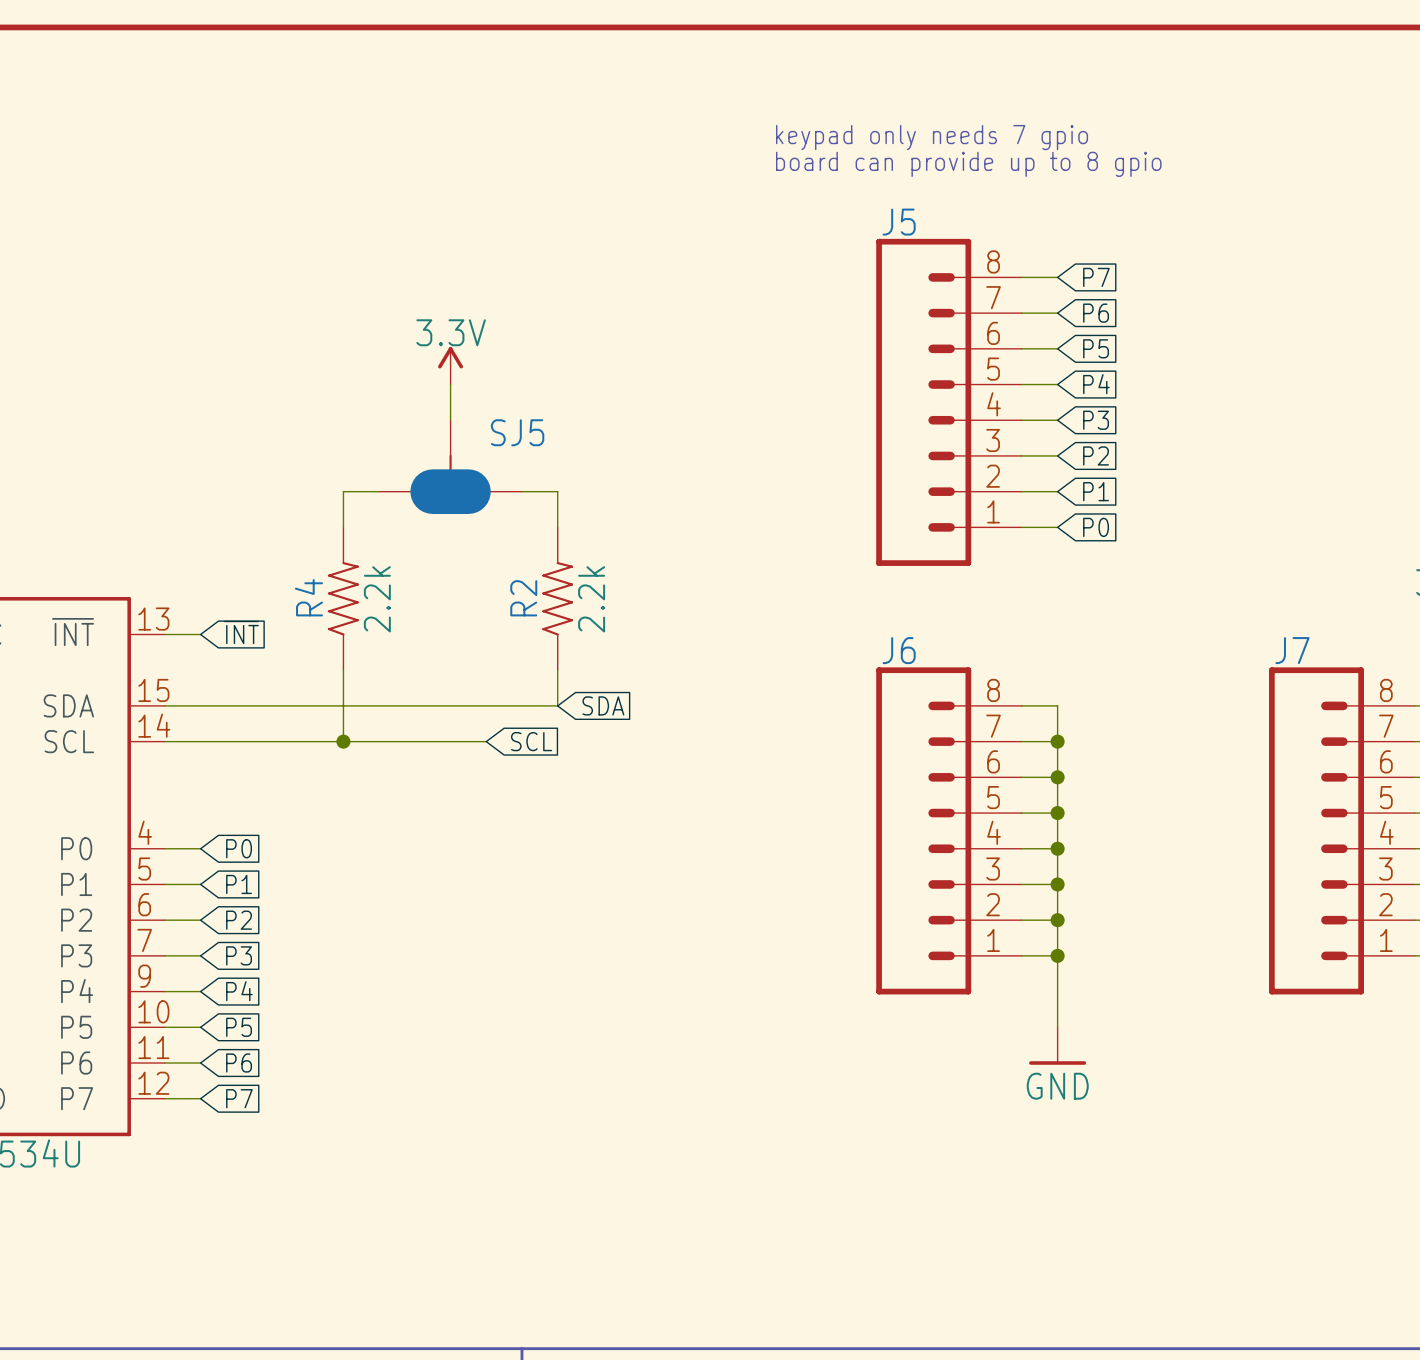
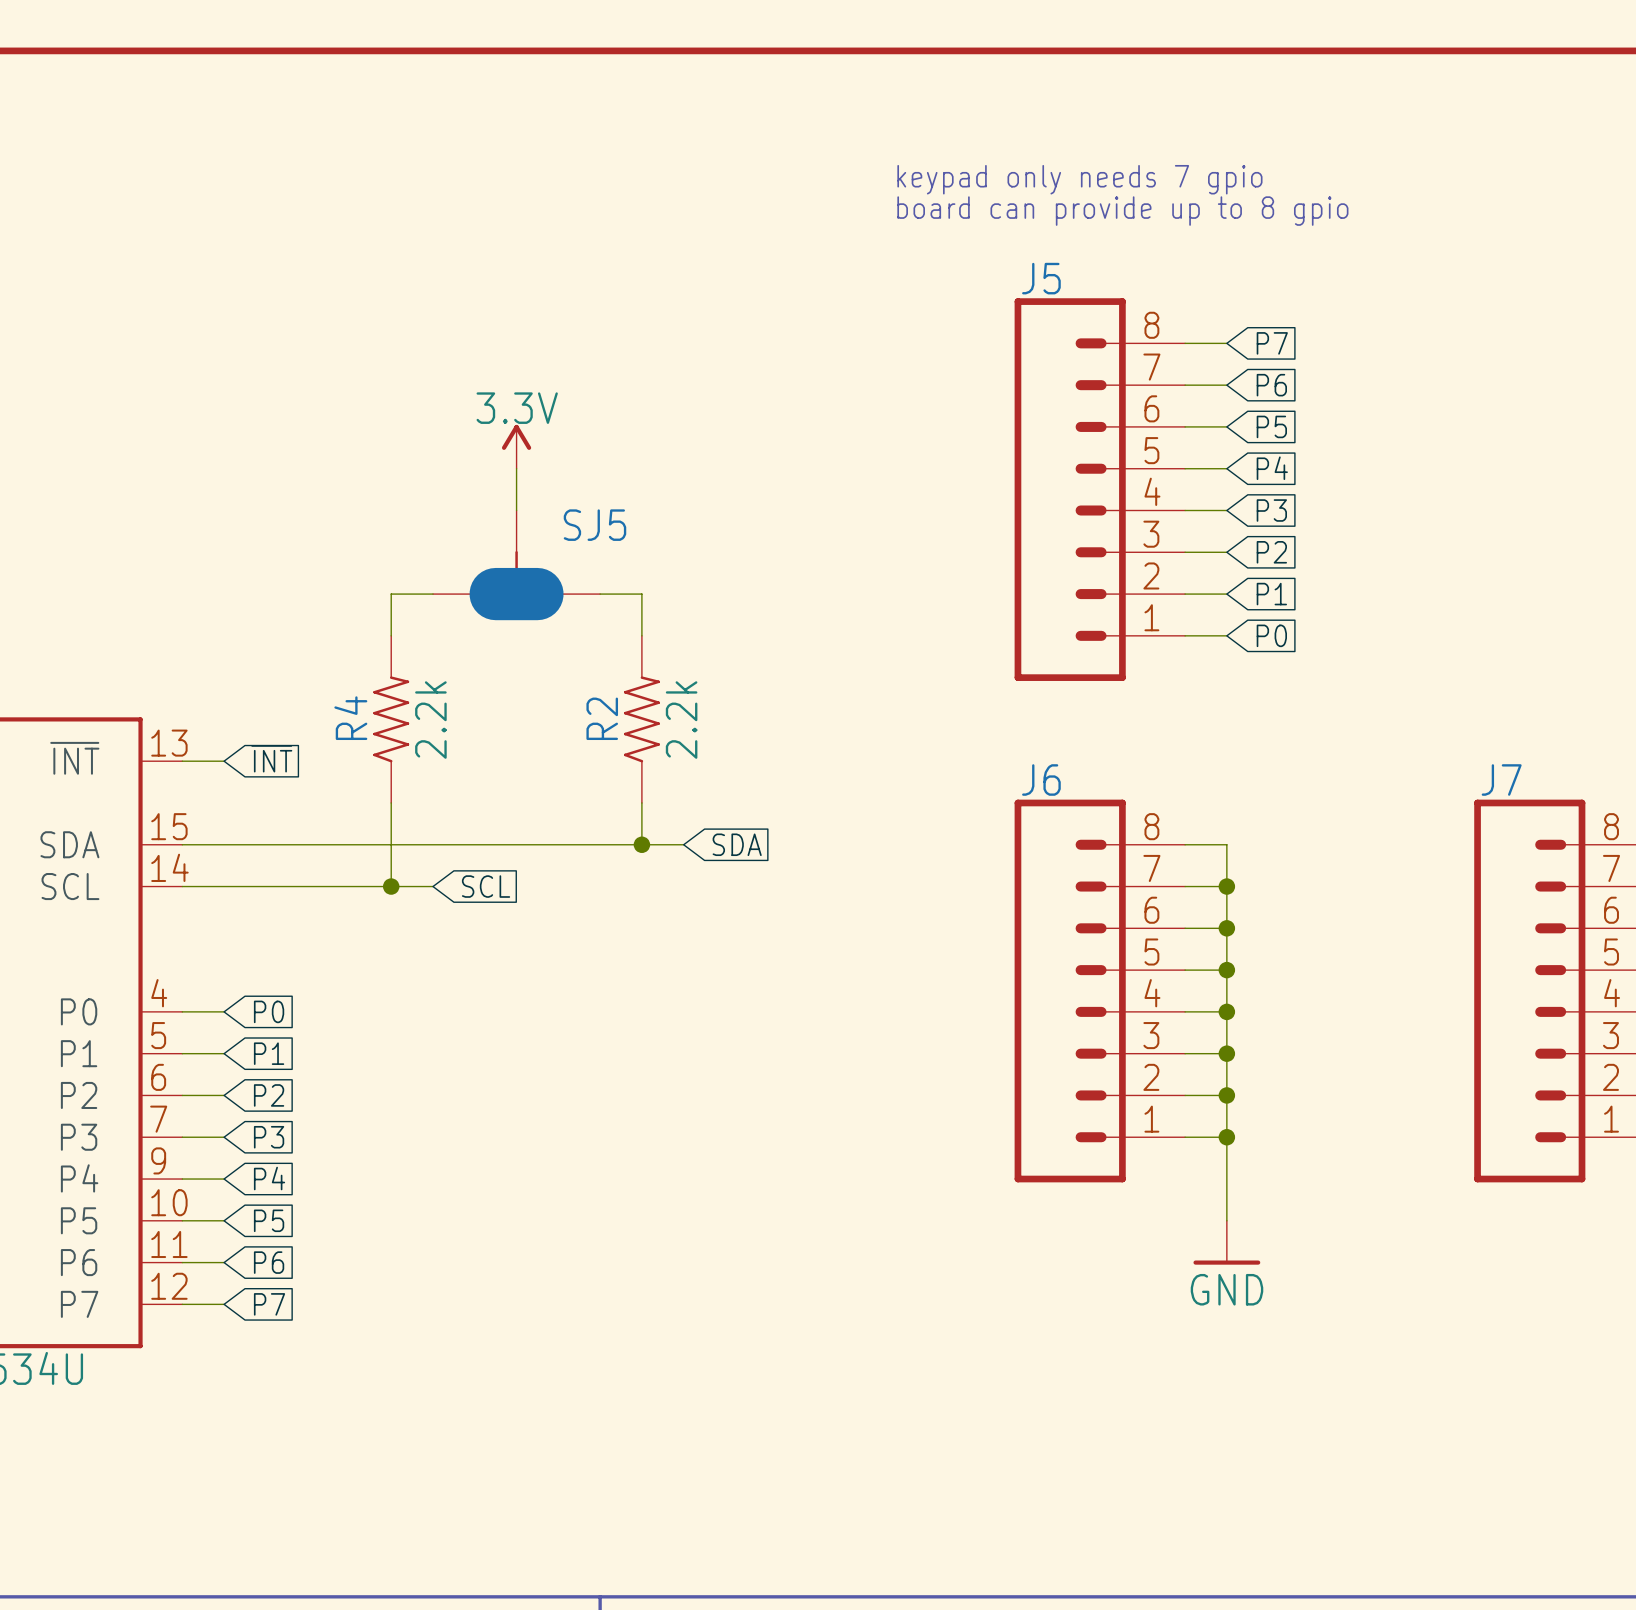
wire: none -> (641, 844) (683, 844)
junction: none -> (641, 844)
global label position: SDA (603, 705) -> SDA (737, 844)
wire: (379, 741) (486, 741) -> none
global label position: SCL (531, 741) -> SCL (486, 886)

